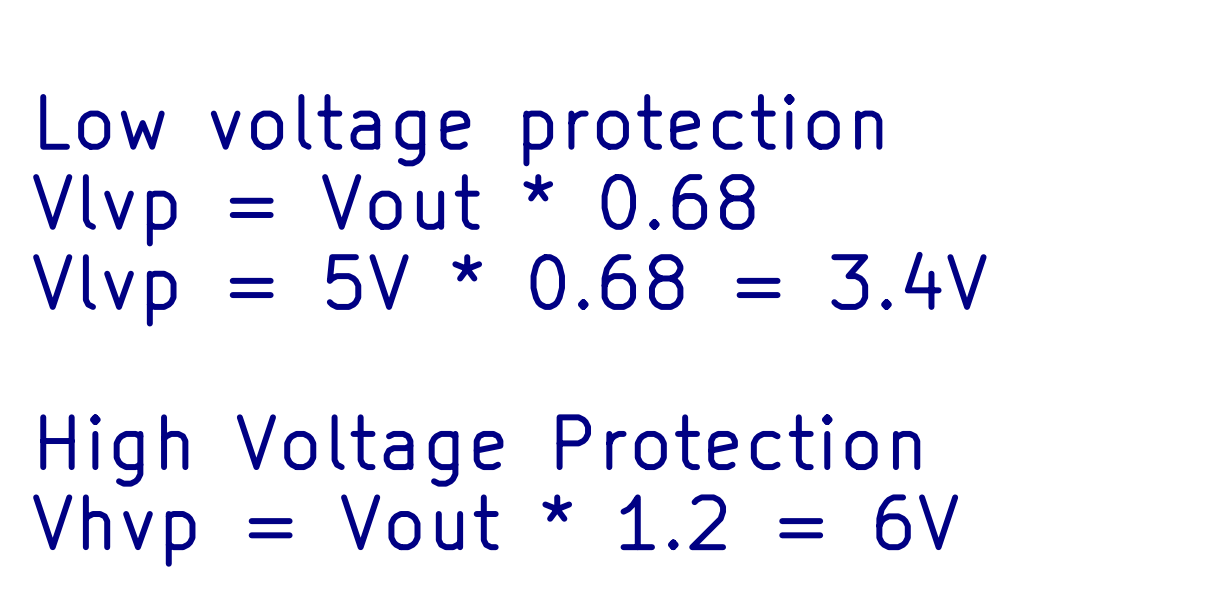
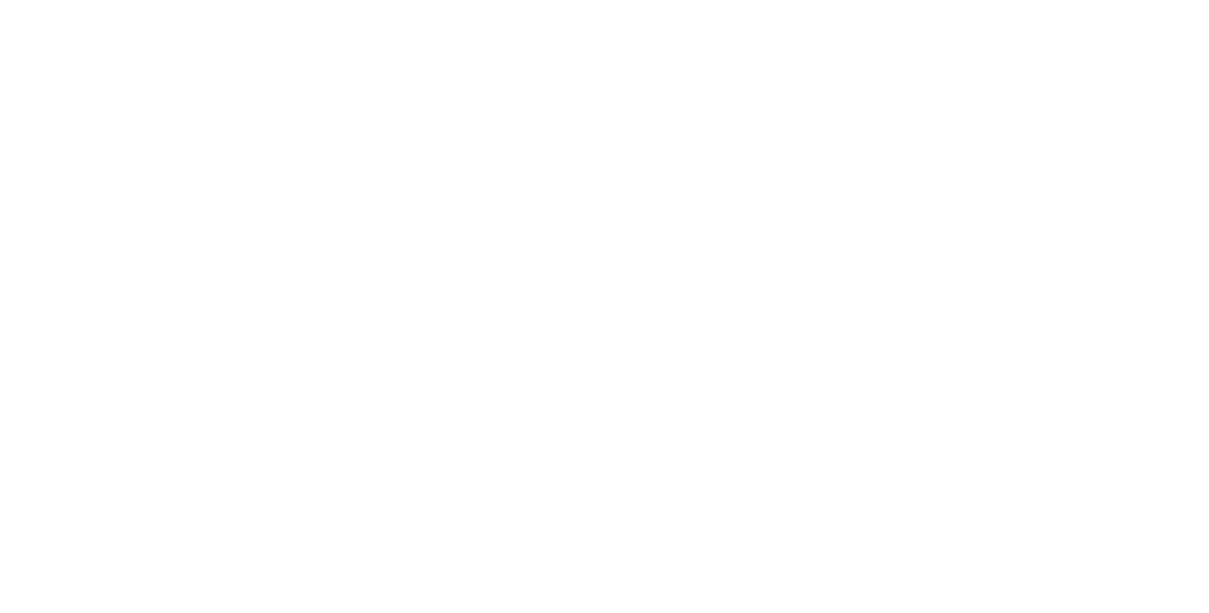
text: Low voltage protection (461, 130) -> none
text: Vlvp = Vout * 0.68 (393, 210) -> none
text: Vlvp = 5V * 0.68 = 3.4V (509, 289) -> none
text: High Voltage Protection (480, 450) -> none
text: Vhvp = Vout * 1.2 = 6V (495, 530) -> none

